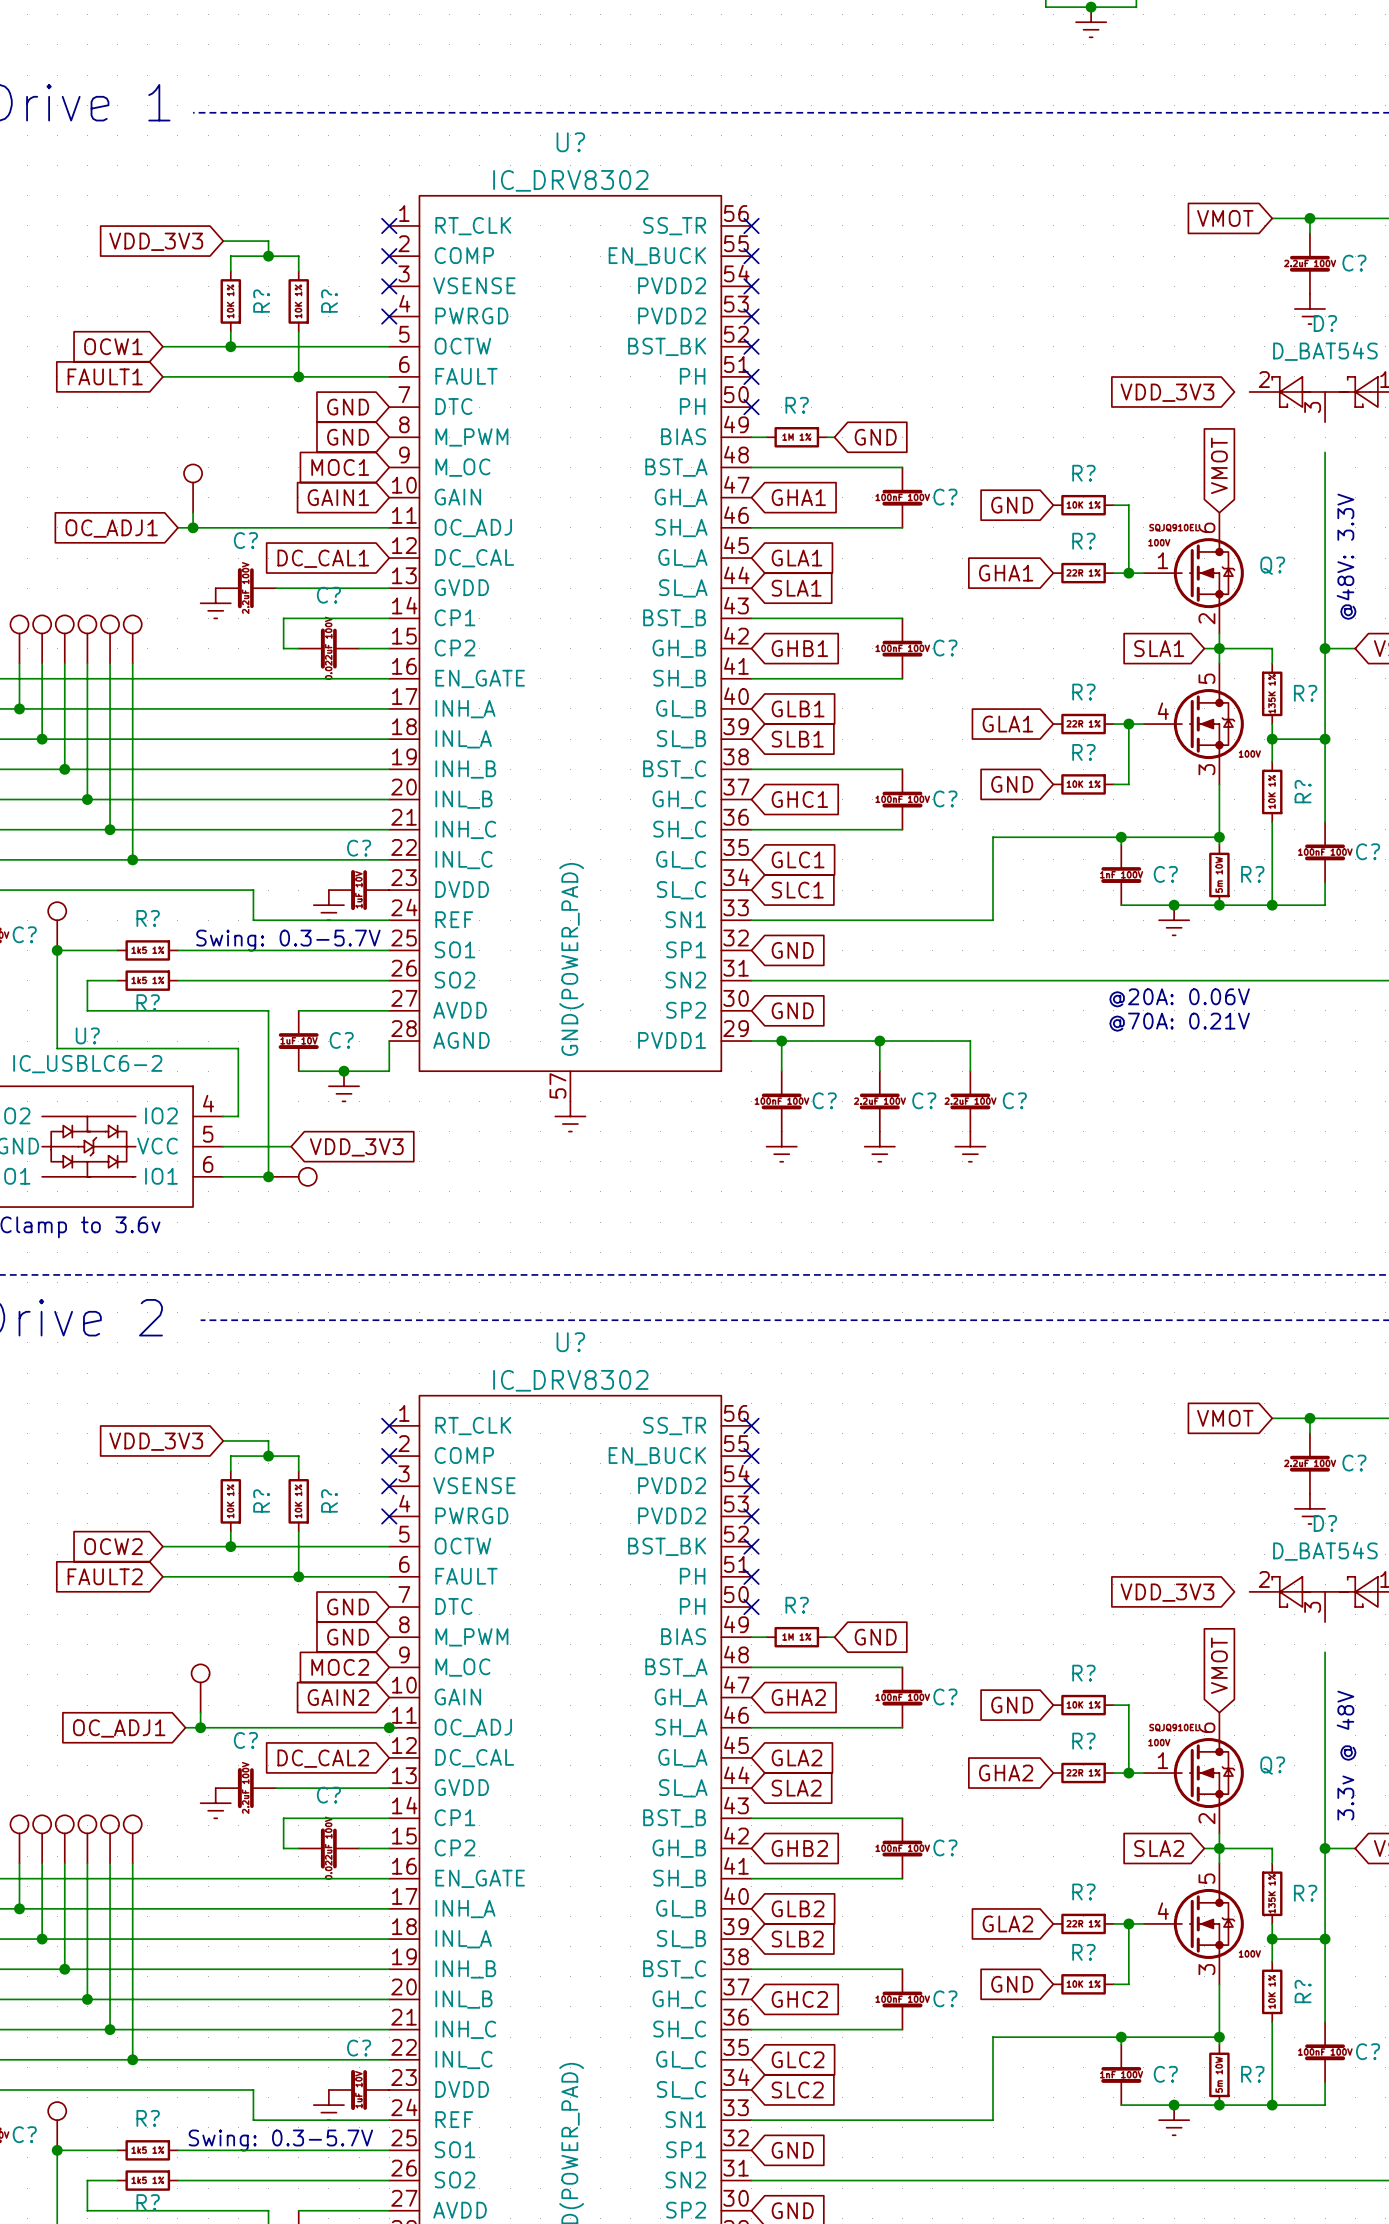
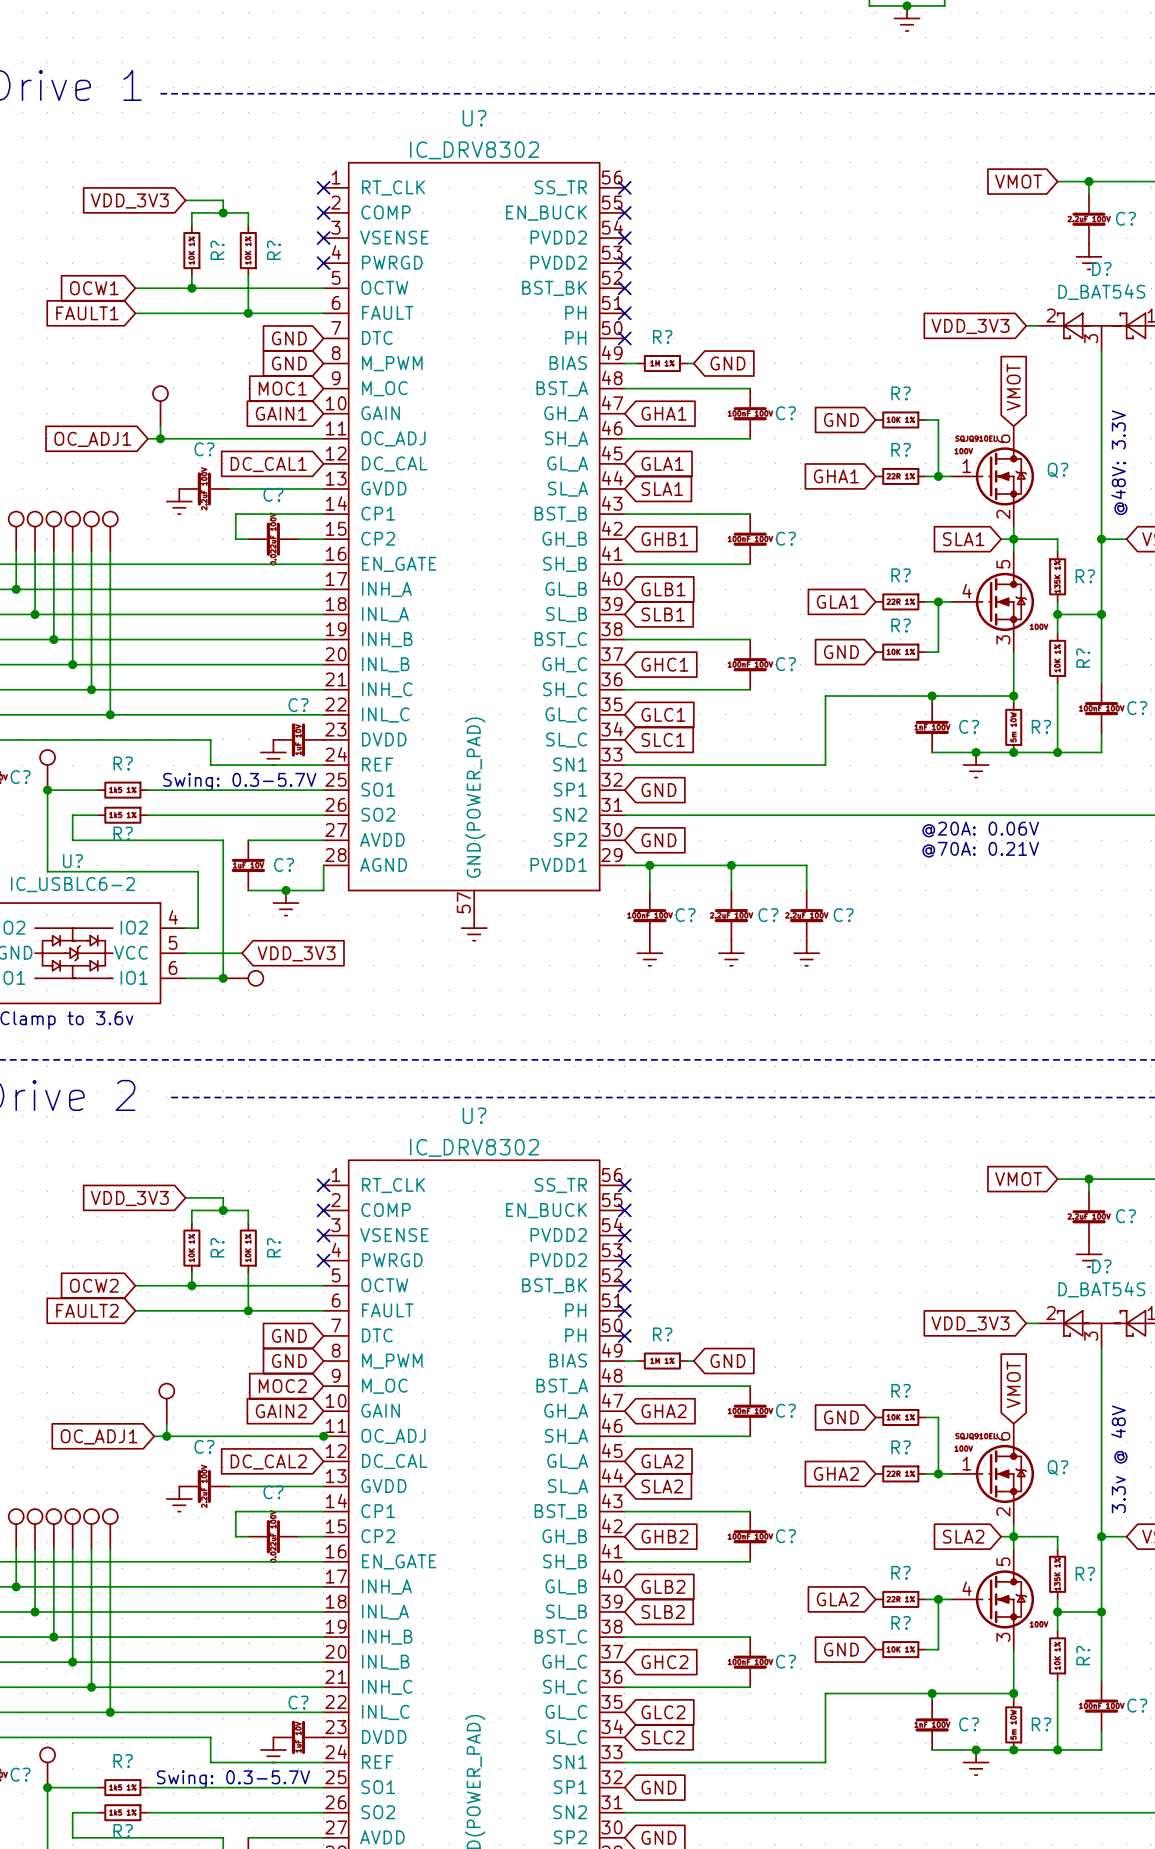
wire: none -> (1026, 325) (1038, 325)
wire: none -> (1101, 350) (1101, 376)
wire: none -> (1026, 1323) (1038, 1323)
wire: none -> (1101, 1348) (1101, 1373)

